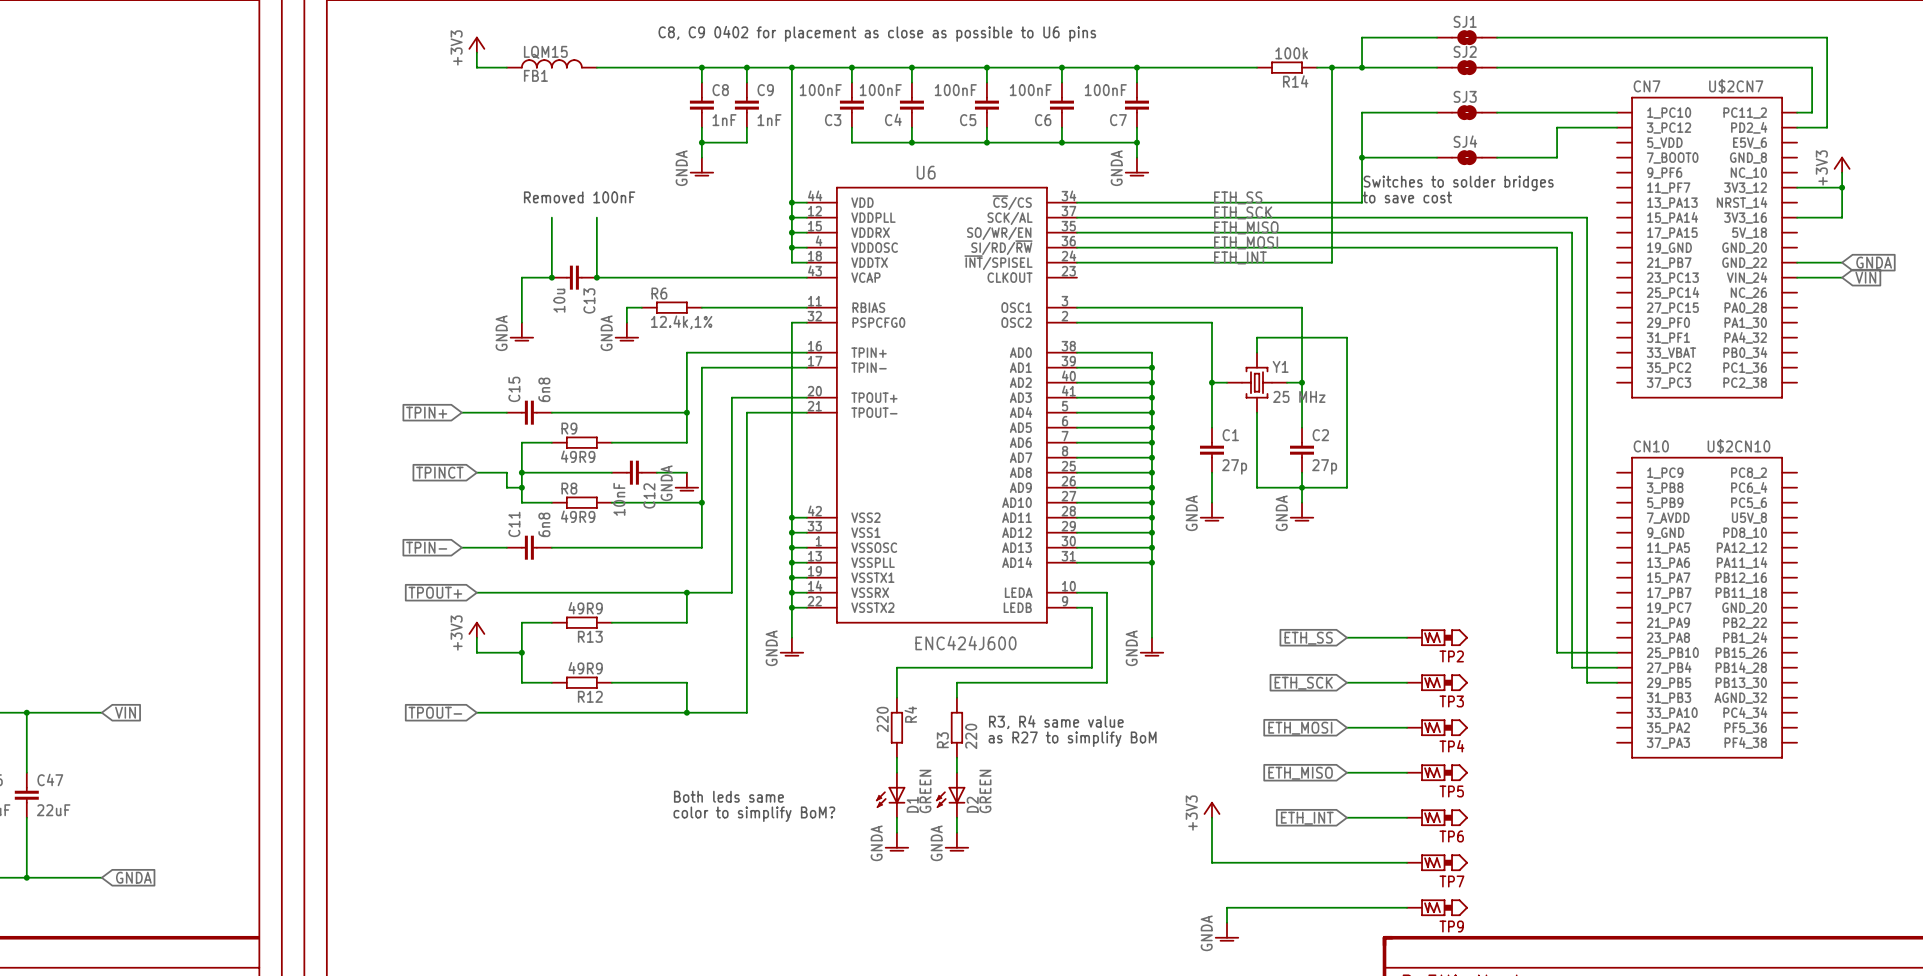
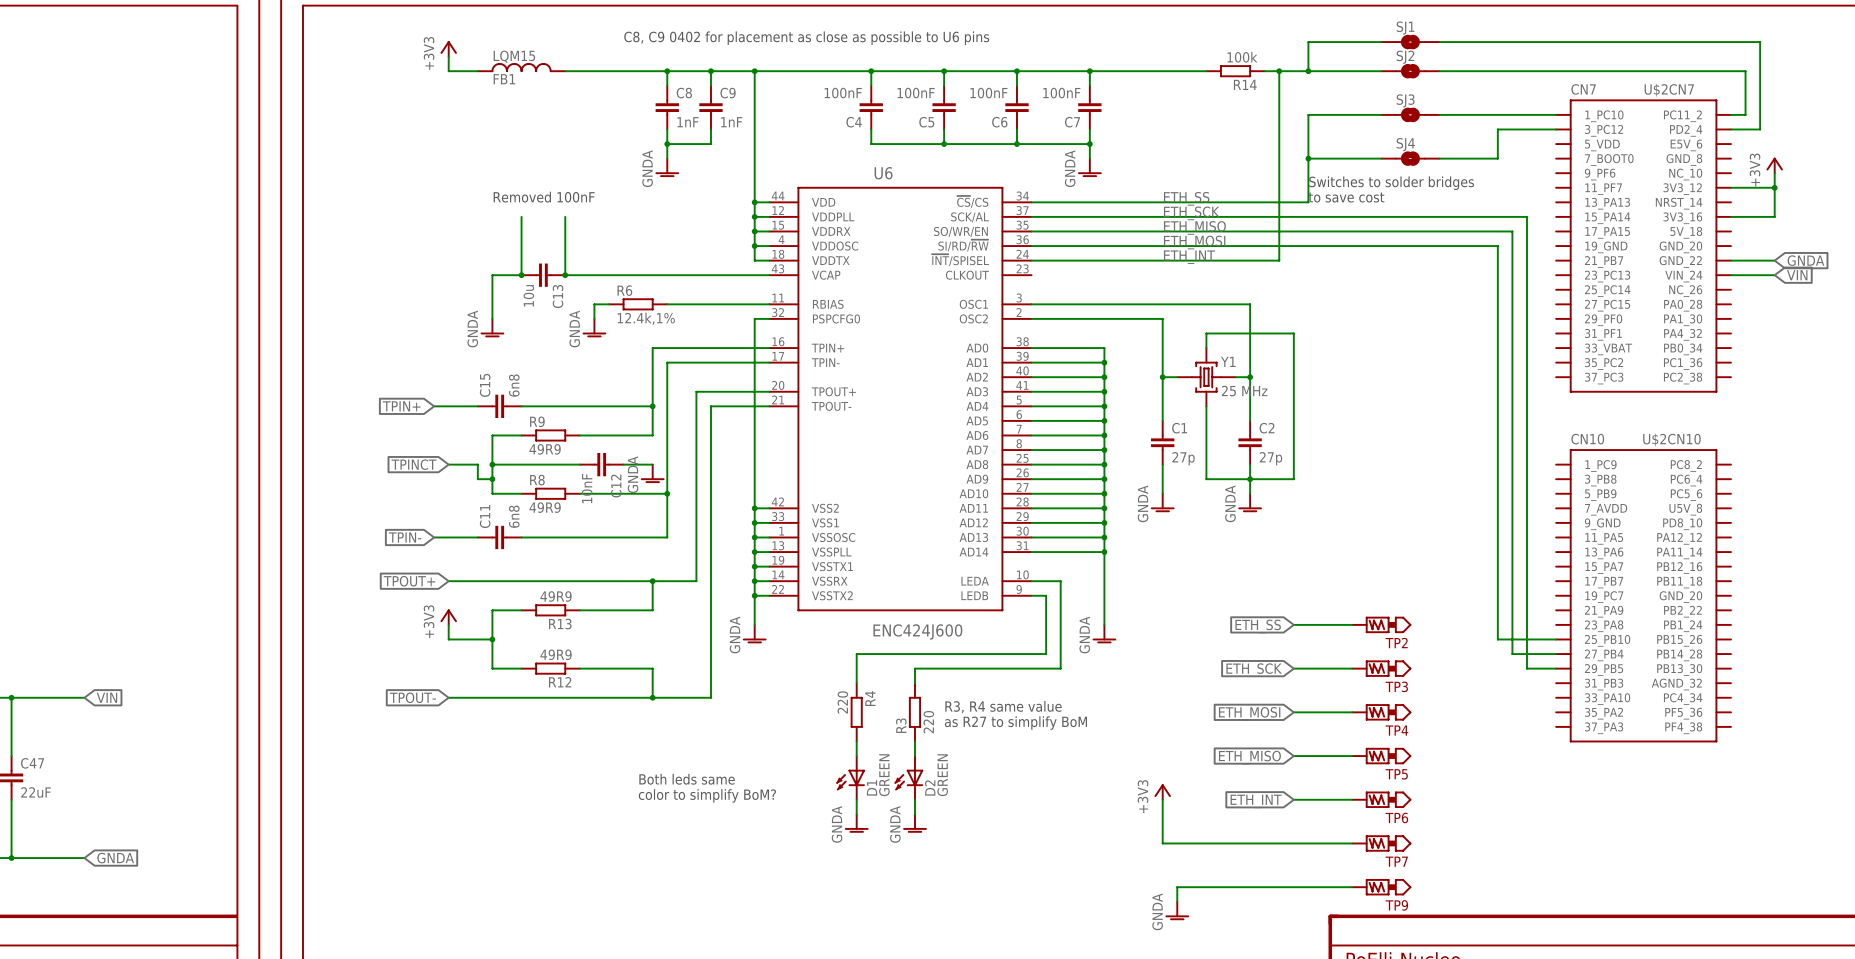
wire: (851, 67) (851, 82) -> none
junction: (851, 67) -> none
C3: 100nF (851, 105) -> none
wire: (851, 127) (851, 142) (911, 142) -> none
junction: (911, 142) -> none

